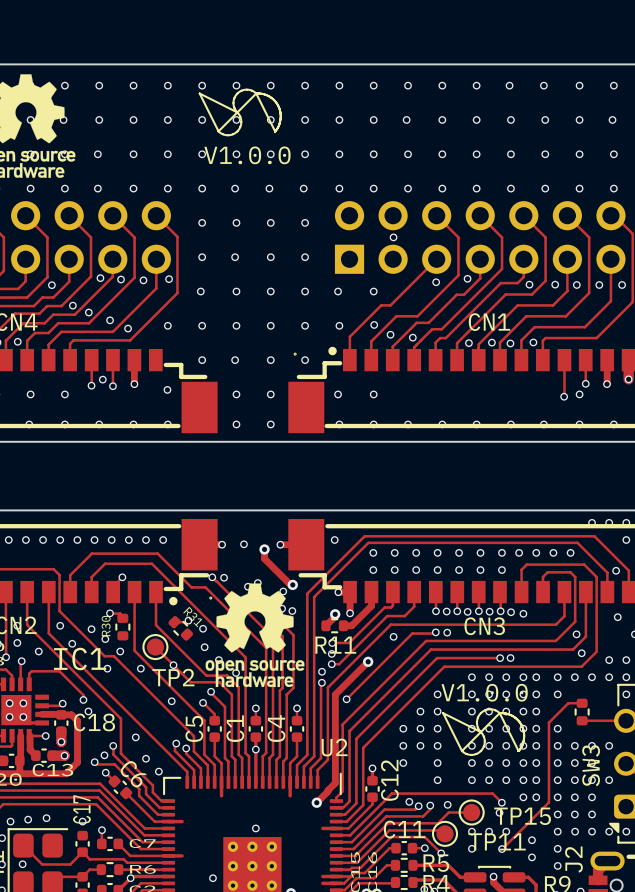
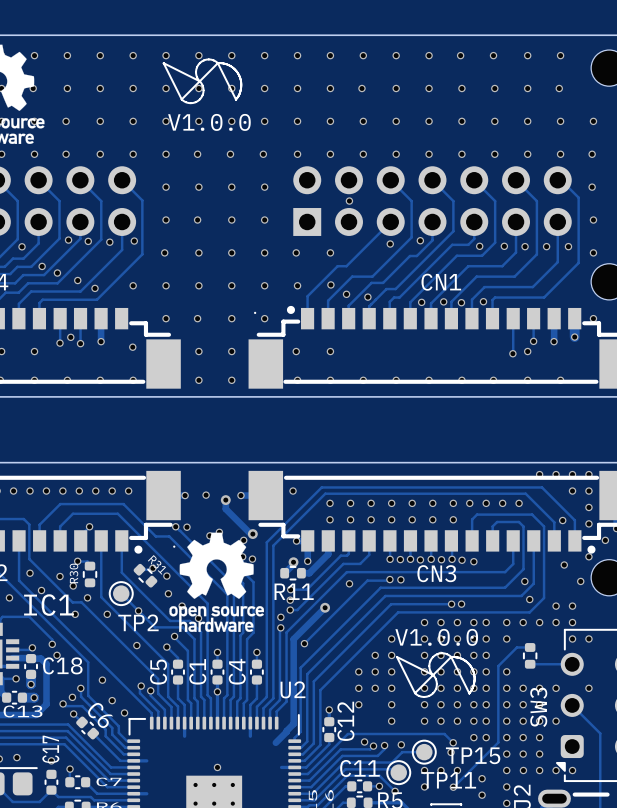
via: (316, 802) -> none

